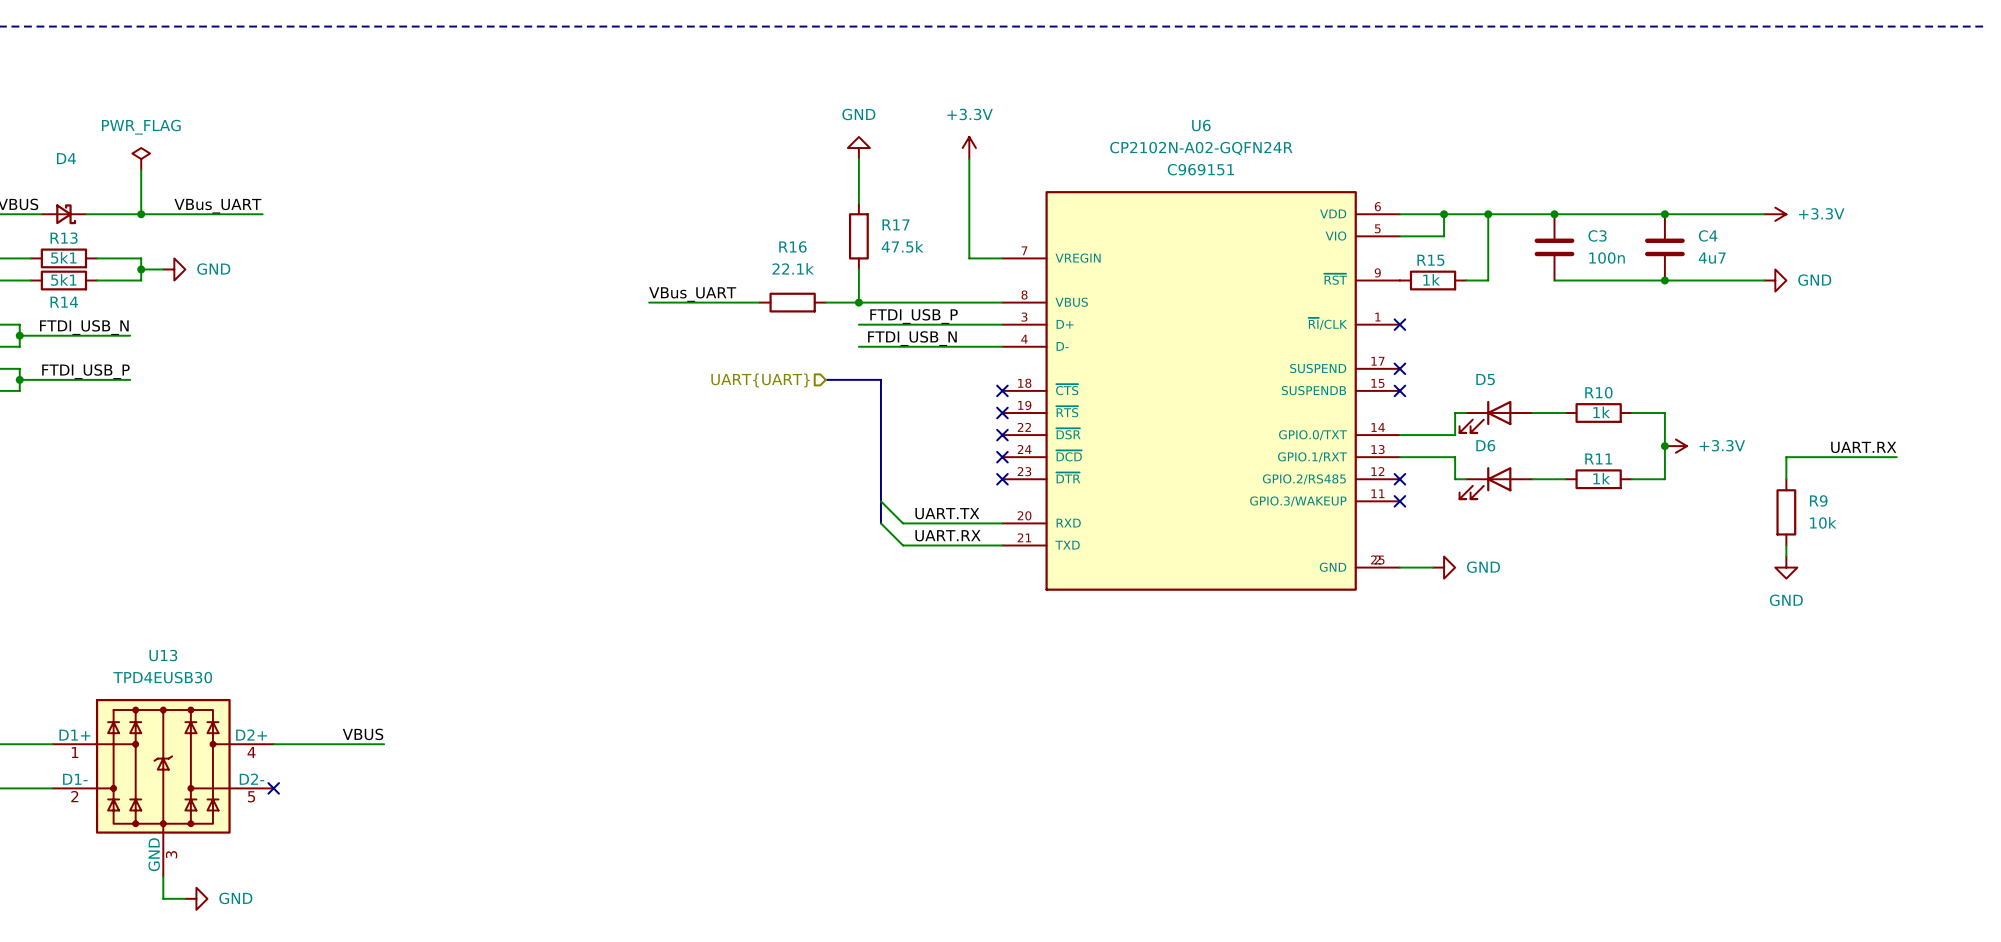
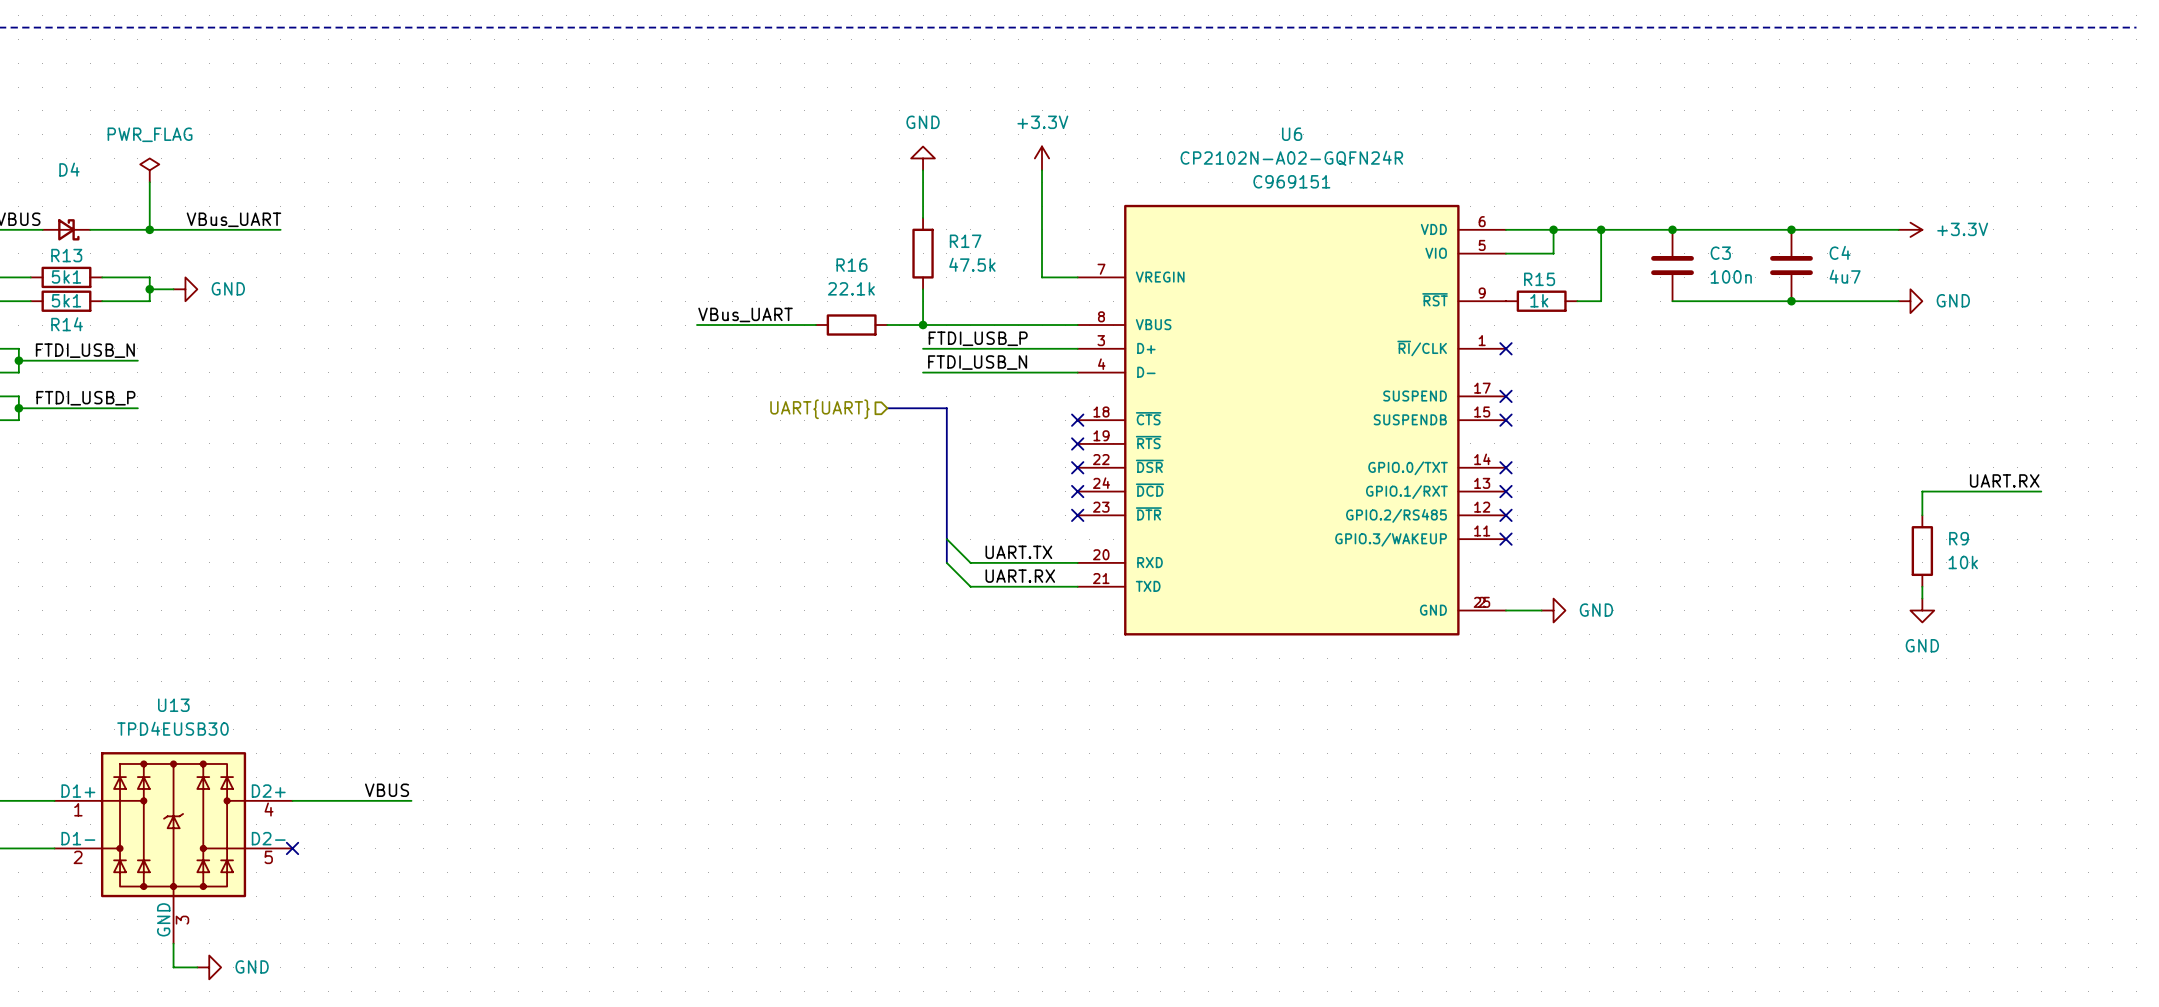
wire: (1466, 413) (1455, 413) (1455, 435) (1399, 435) -> none
wire: (1532, 413) (1565, 413) -> none
R10: 1k (1598, 413) -> none
wire: (1631, 413) (1664, 413) (1664, 479) (1631, 479) -> none
D5: (1495, 416) -> none
no-connect mark: none -> (1505, 467)
junction: (1664, 446) -> none
power symbol: +3.3V (1675, 446) -> none
wire: (1399, 457) (1455, 457) (1455, 479) (1466, 479) -> none
no-connect mark: none -> (1505, 491)
wire: (1532, 479) (1565, 479) -> none
R11: 1k (1598, 479) -> none
D6: (1495, 483) -> none

